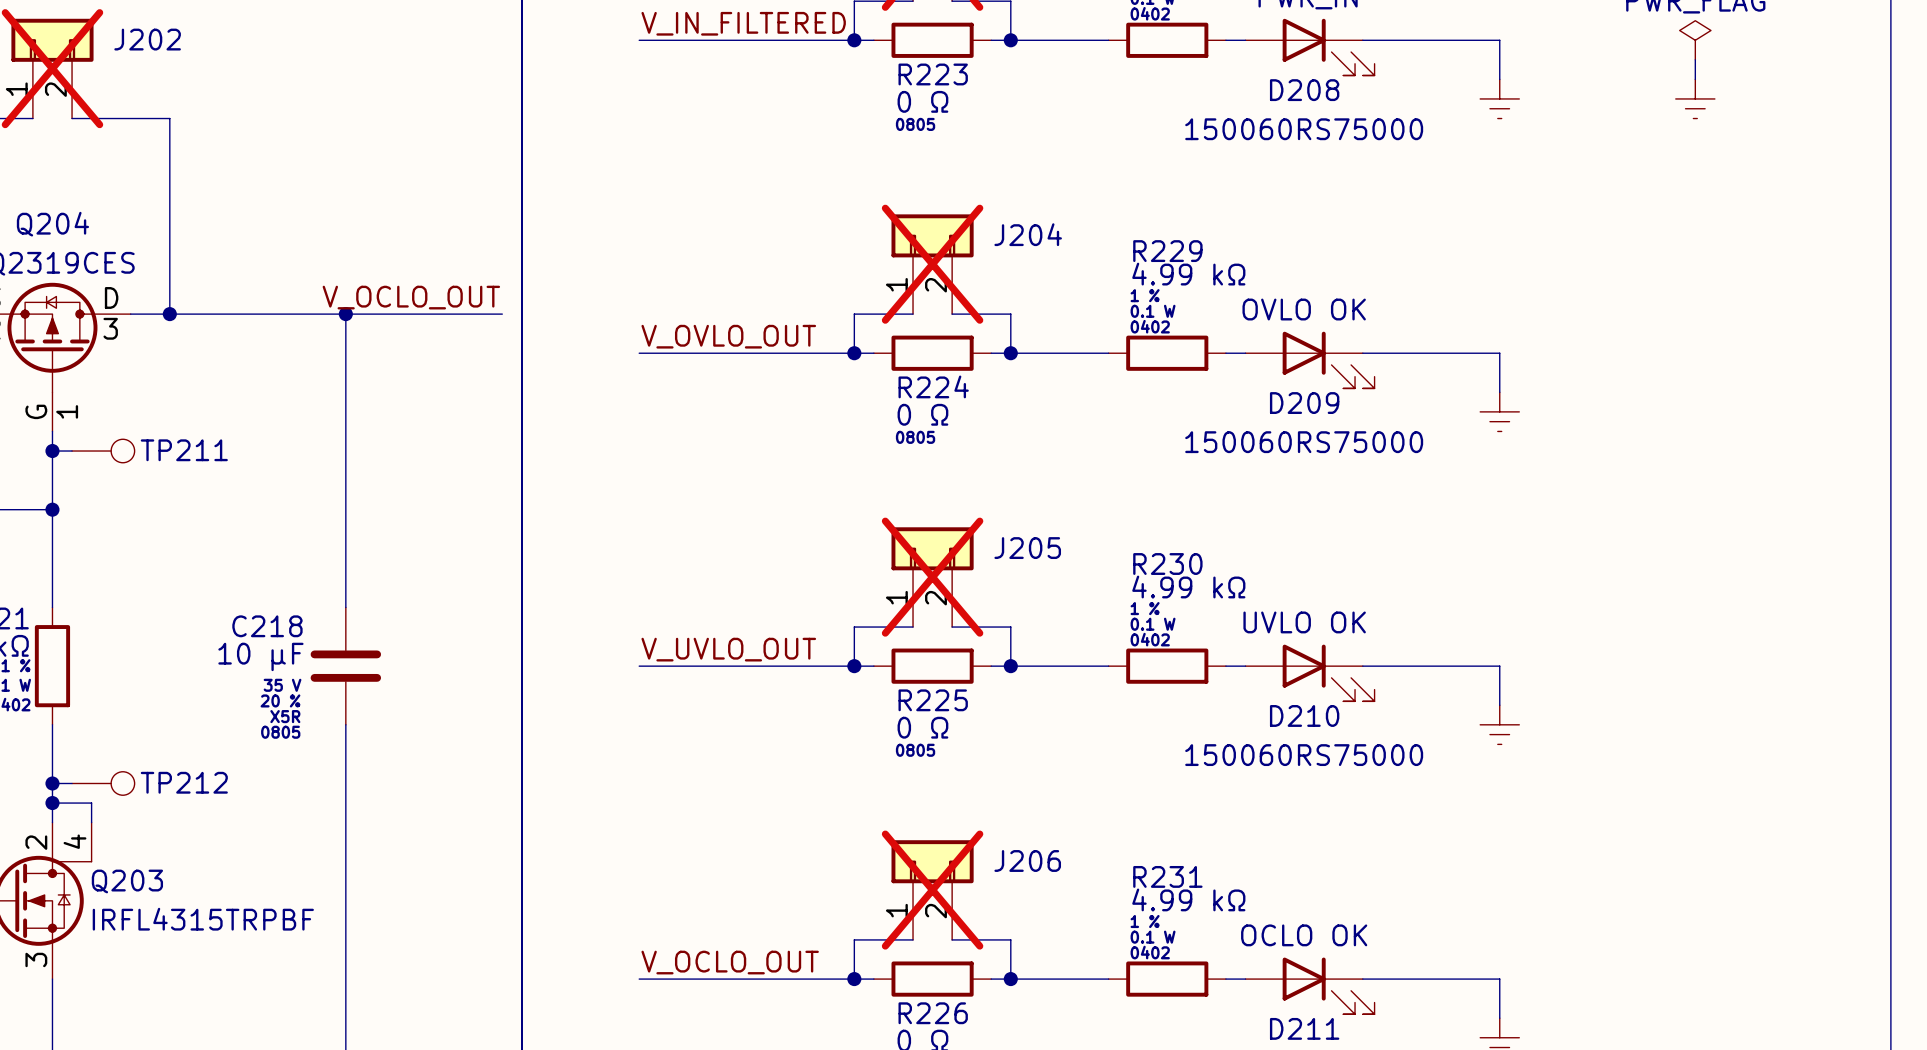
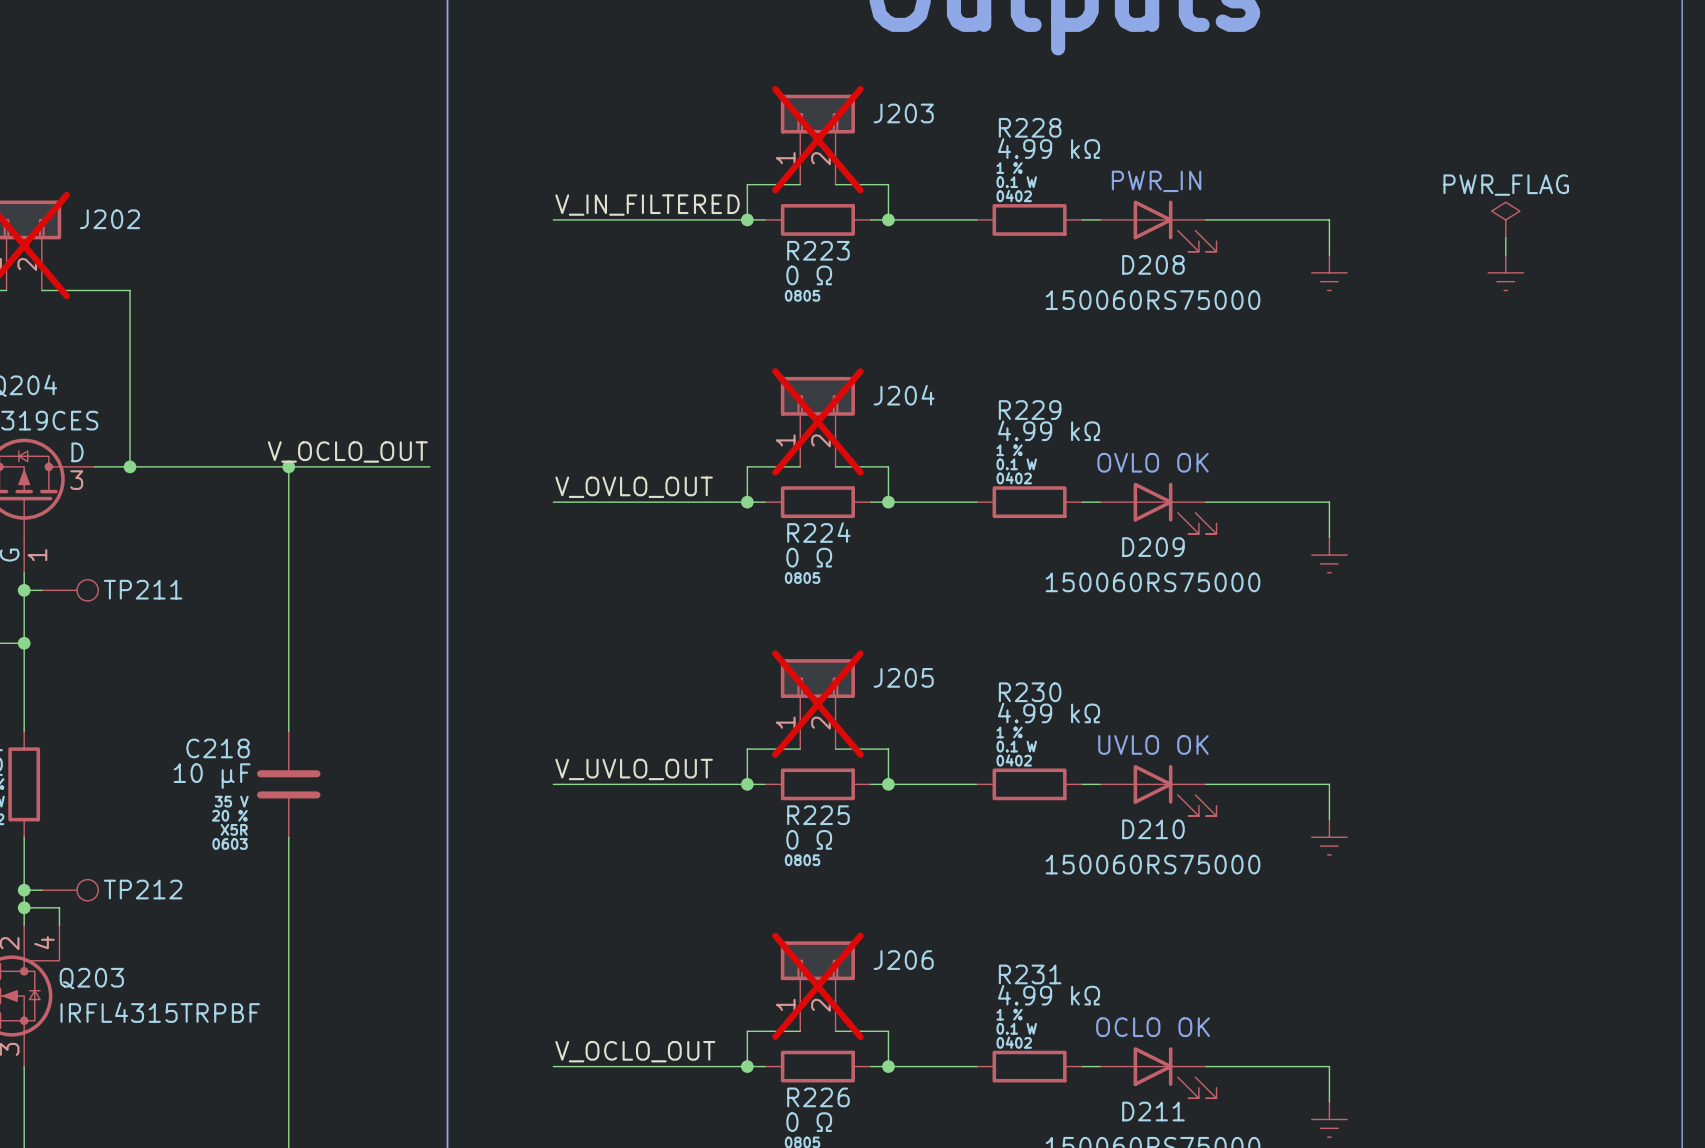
C218 text: 0805 (280, 732) -> 0603 (230, 843)

